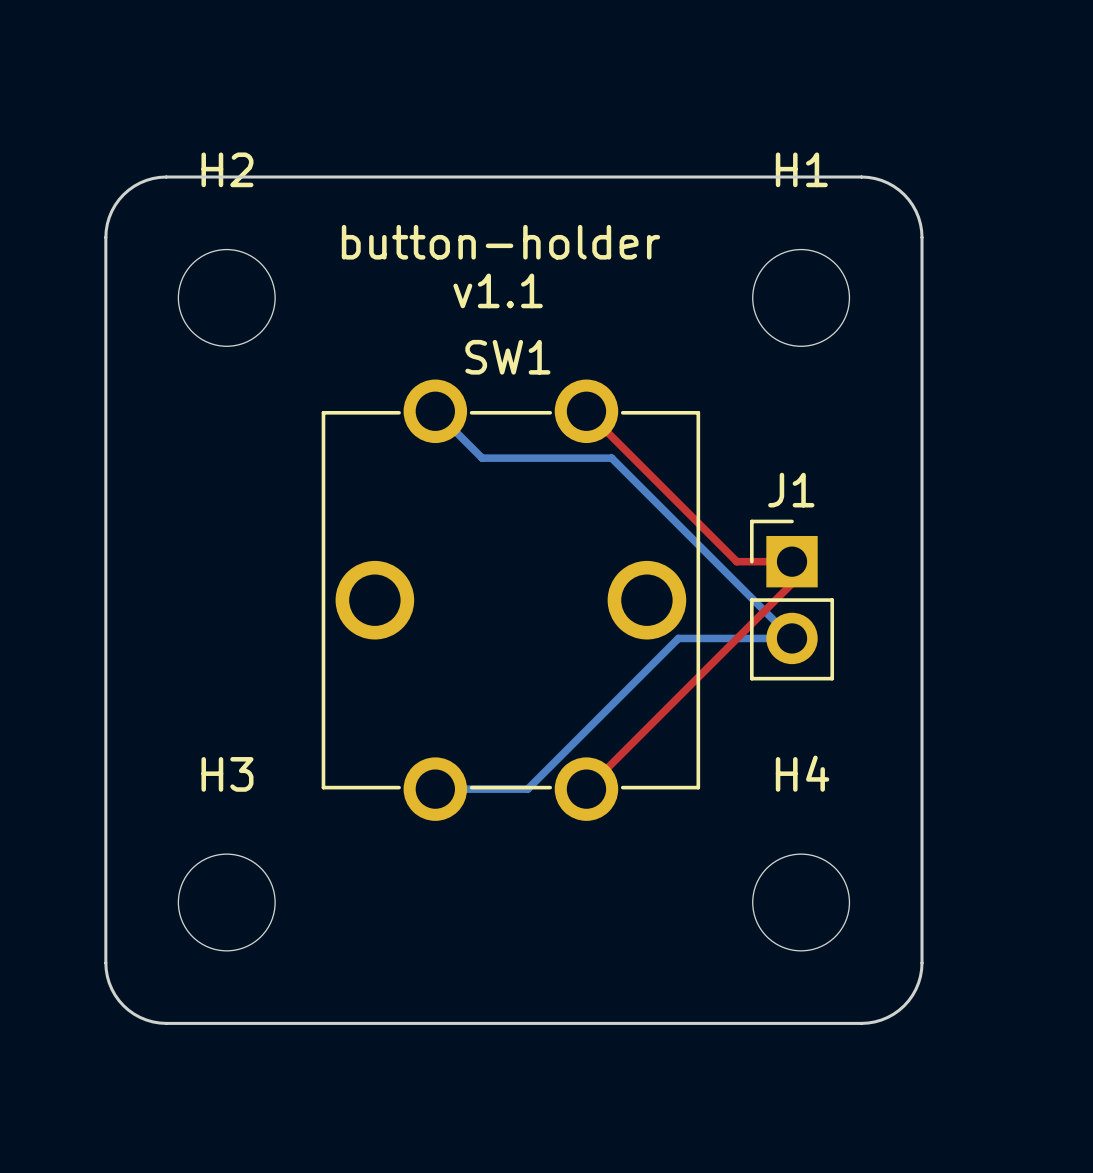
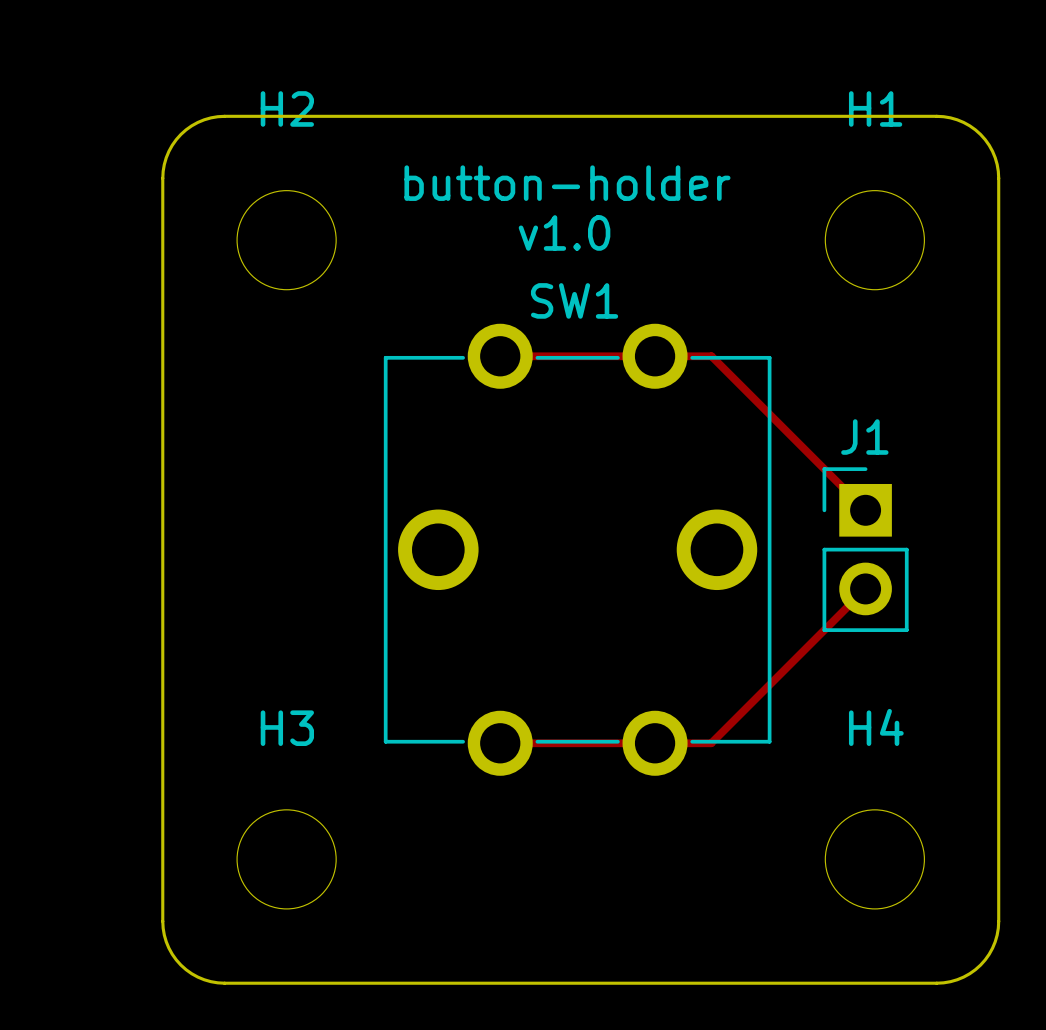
text: v1.1 (498, 290) -> v1.0 (564, 232)
top track: none -> (500, 356) (711, 356) (865, 510)
bottom track: (435, 411) (482, 458) (611, 458) (792, 638) (678, 638) (527, 789) (435, 789) -> none
top track: (586, 411) (736, 561) (792, 561) (792, 583) (586, 789) -> none
top track: none -> (865, 588) (711, 743) (500, 743)

